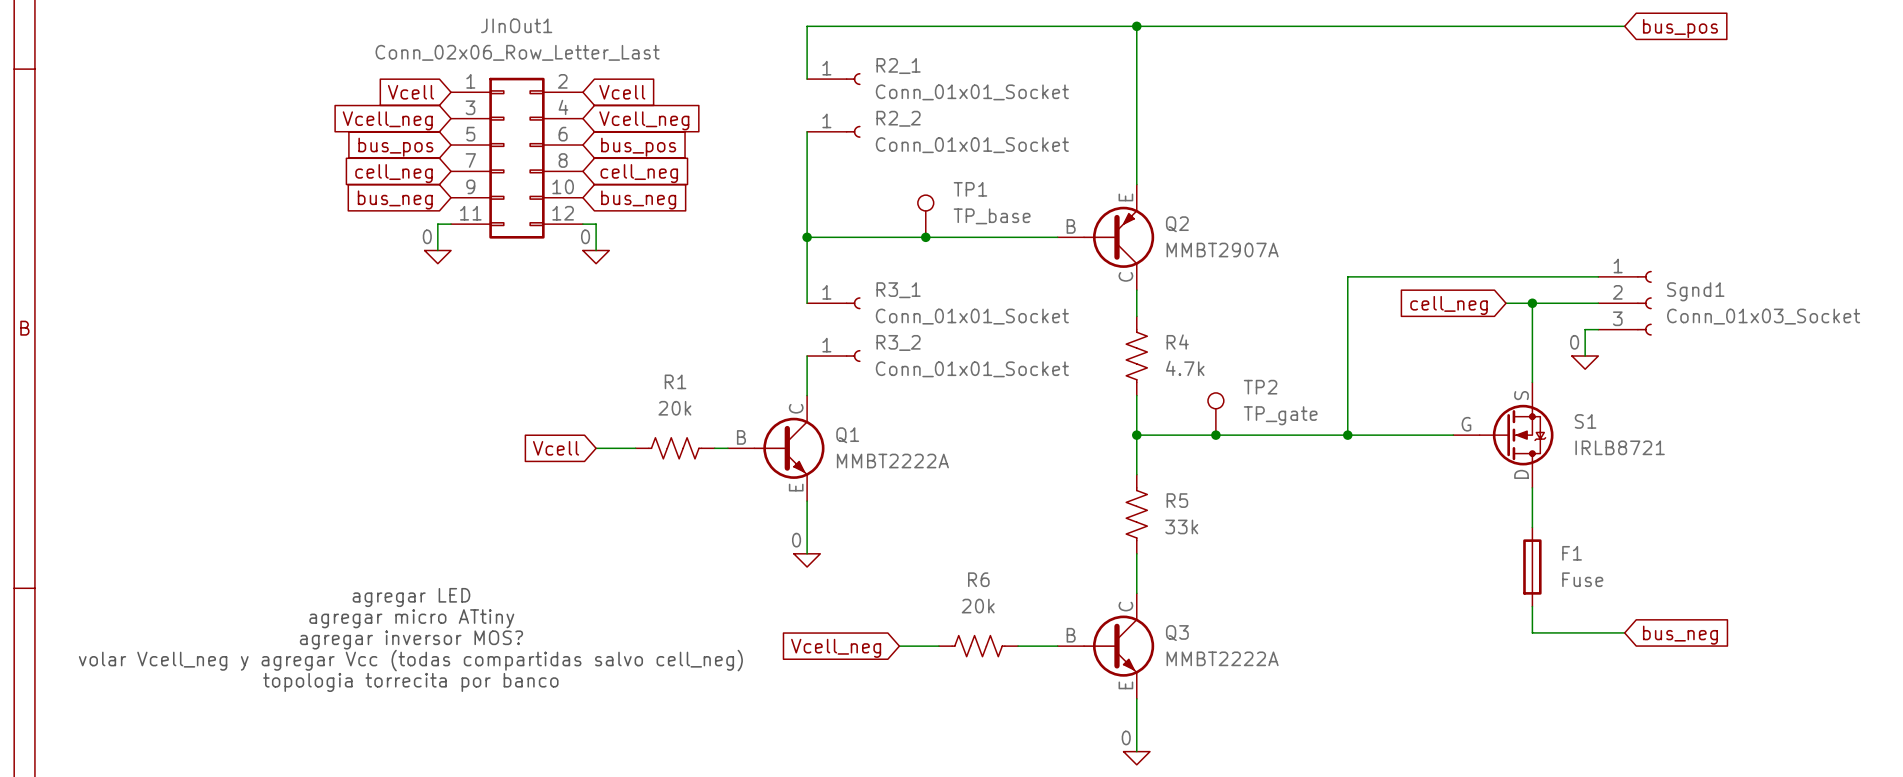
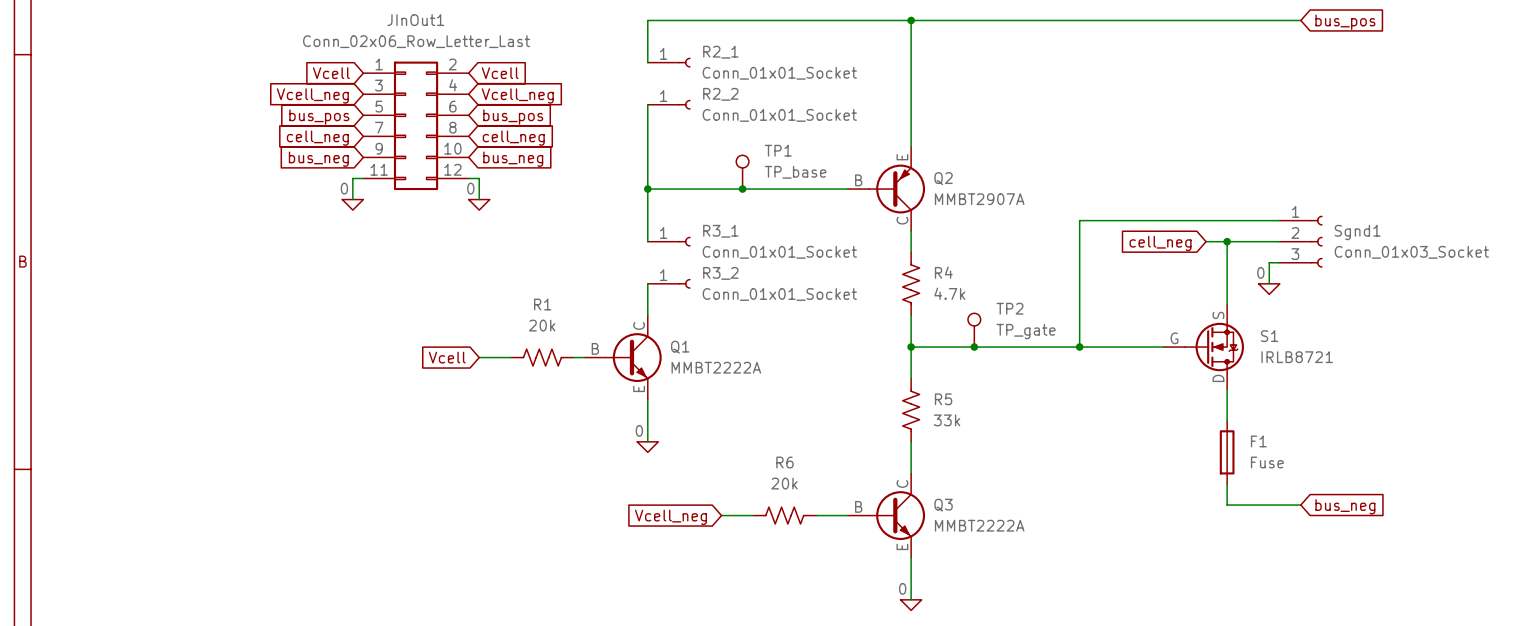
text: agregar LED (411, 597) -> none
text: agregar micro ATtiny (411, 618) -> none
text: agregar inversor MOS? (411, 639) -> none
text: volar Vcell_neg y agregar Vcc (todas compartidas salvo cell_neg) (410, 660) -> none
text: topologia torrecita por banco (410, 682) -> none

